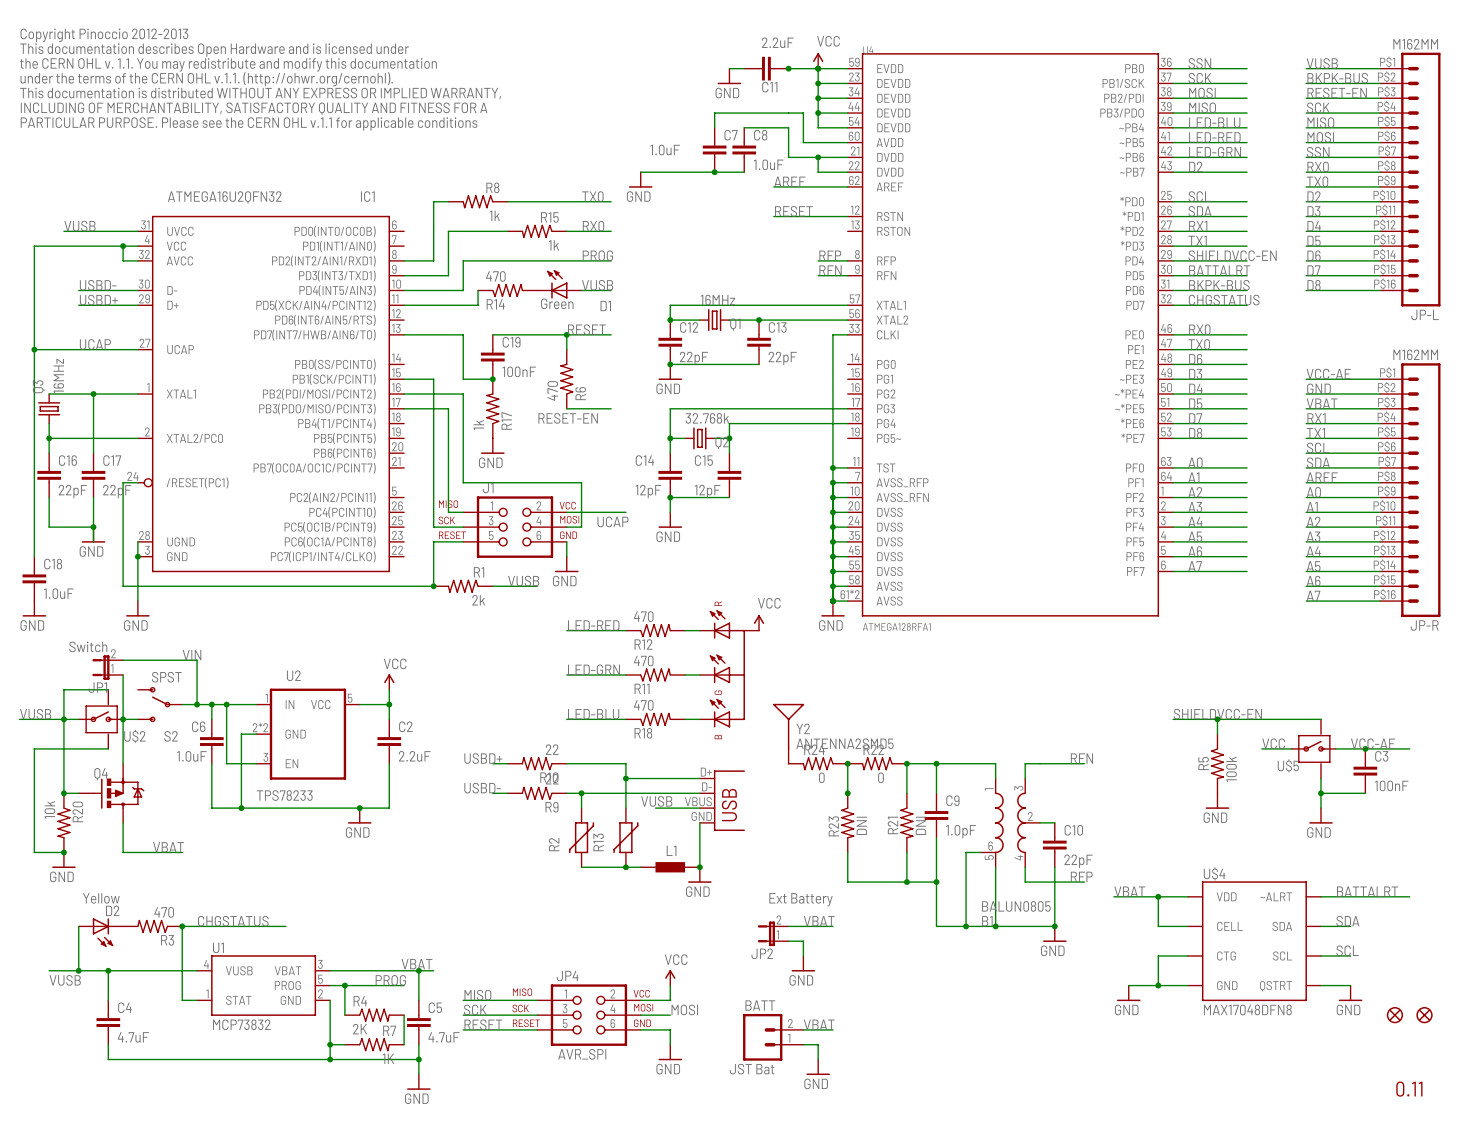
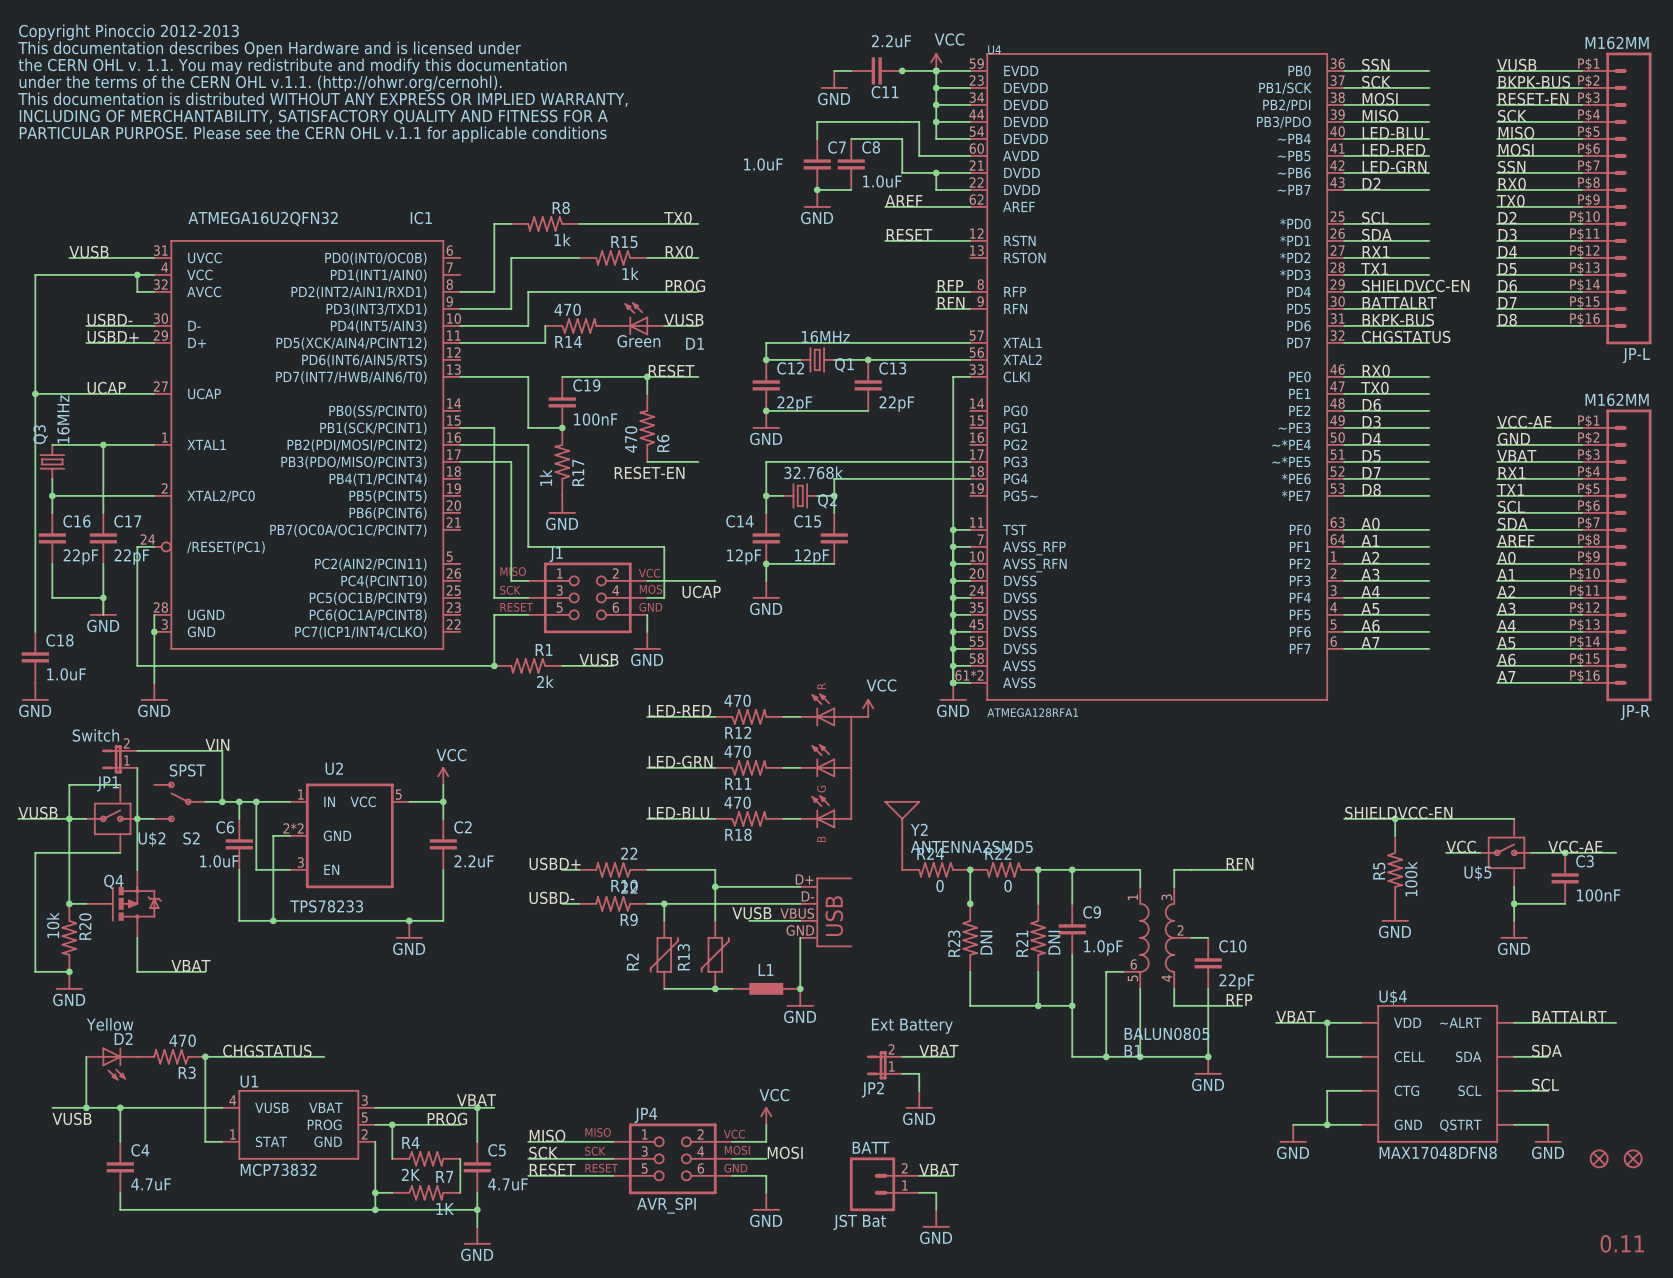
wire: (640, 172) (714, 172) -> none
power symbol position: GND (640, 179) -> GND (817, 198)

